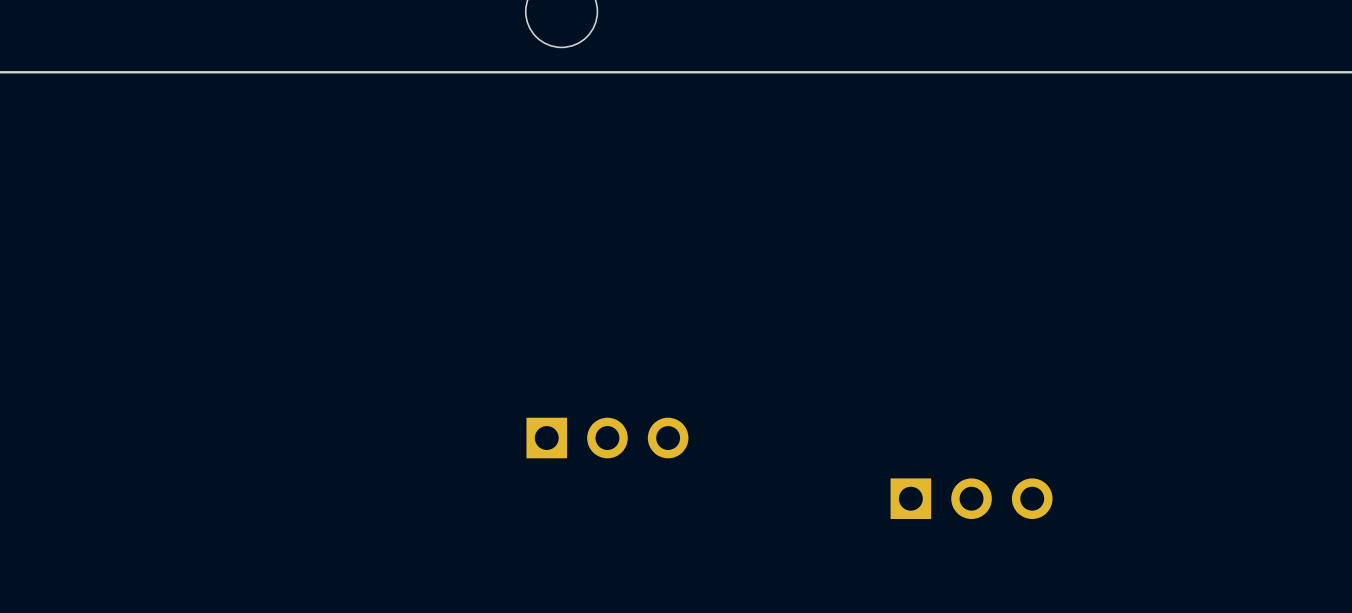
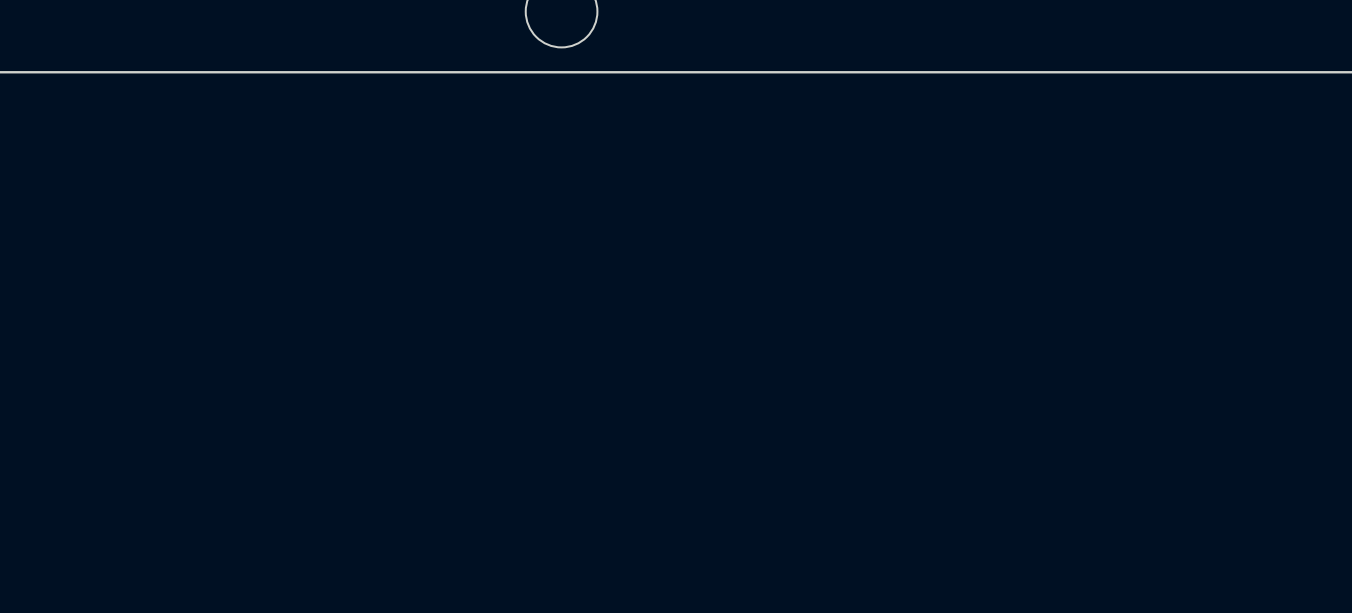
part: (607, 438) -> none
part: (971, 498) -> none

